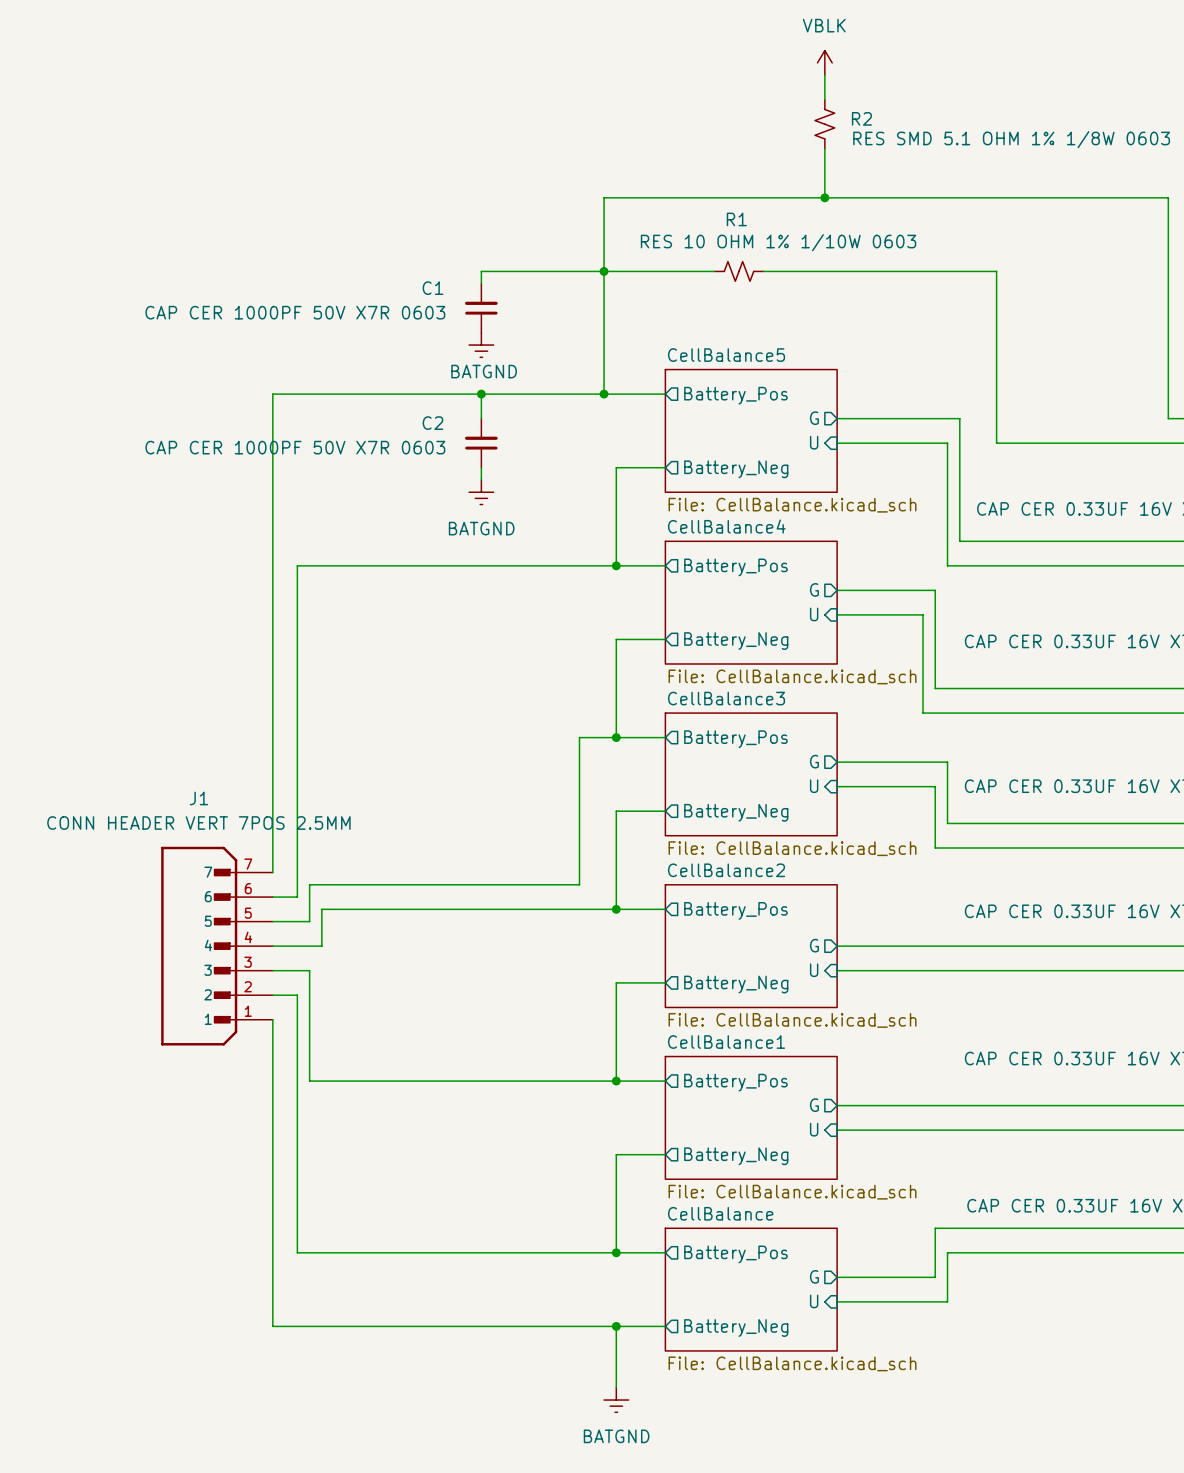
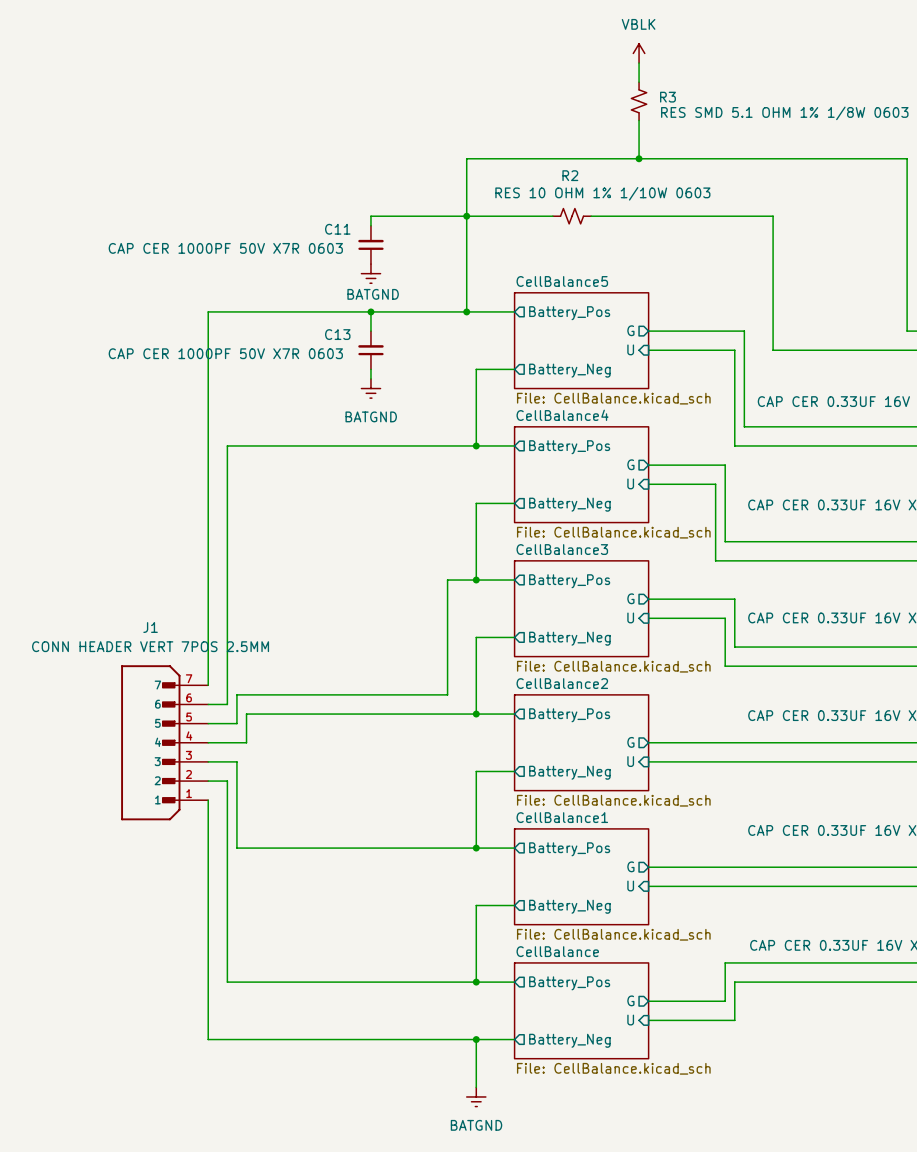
R2 name: R2 (861, 118) -> R3 (667, 97)
R1 name: R1 (736, 219) -> R2 (570, 175)
C1 name: C1 (432, 288) -> C11 (337, 229)
C2 name: C2 (432, 423) -> C13 (337, 334)

